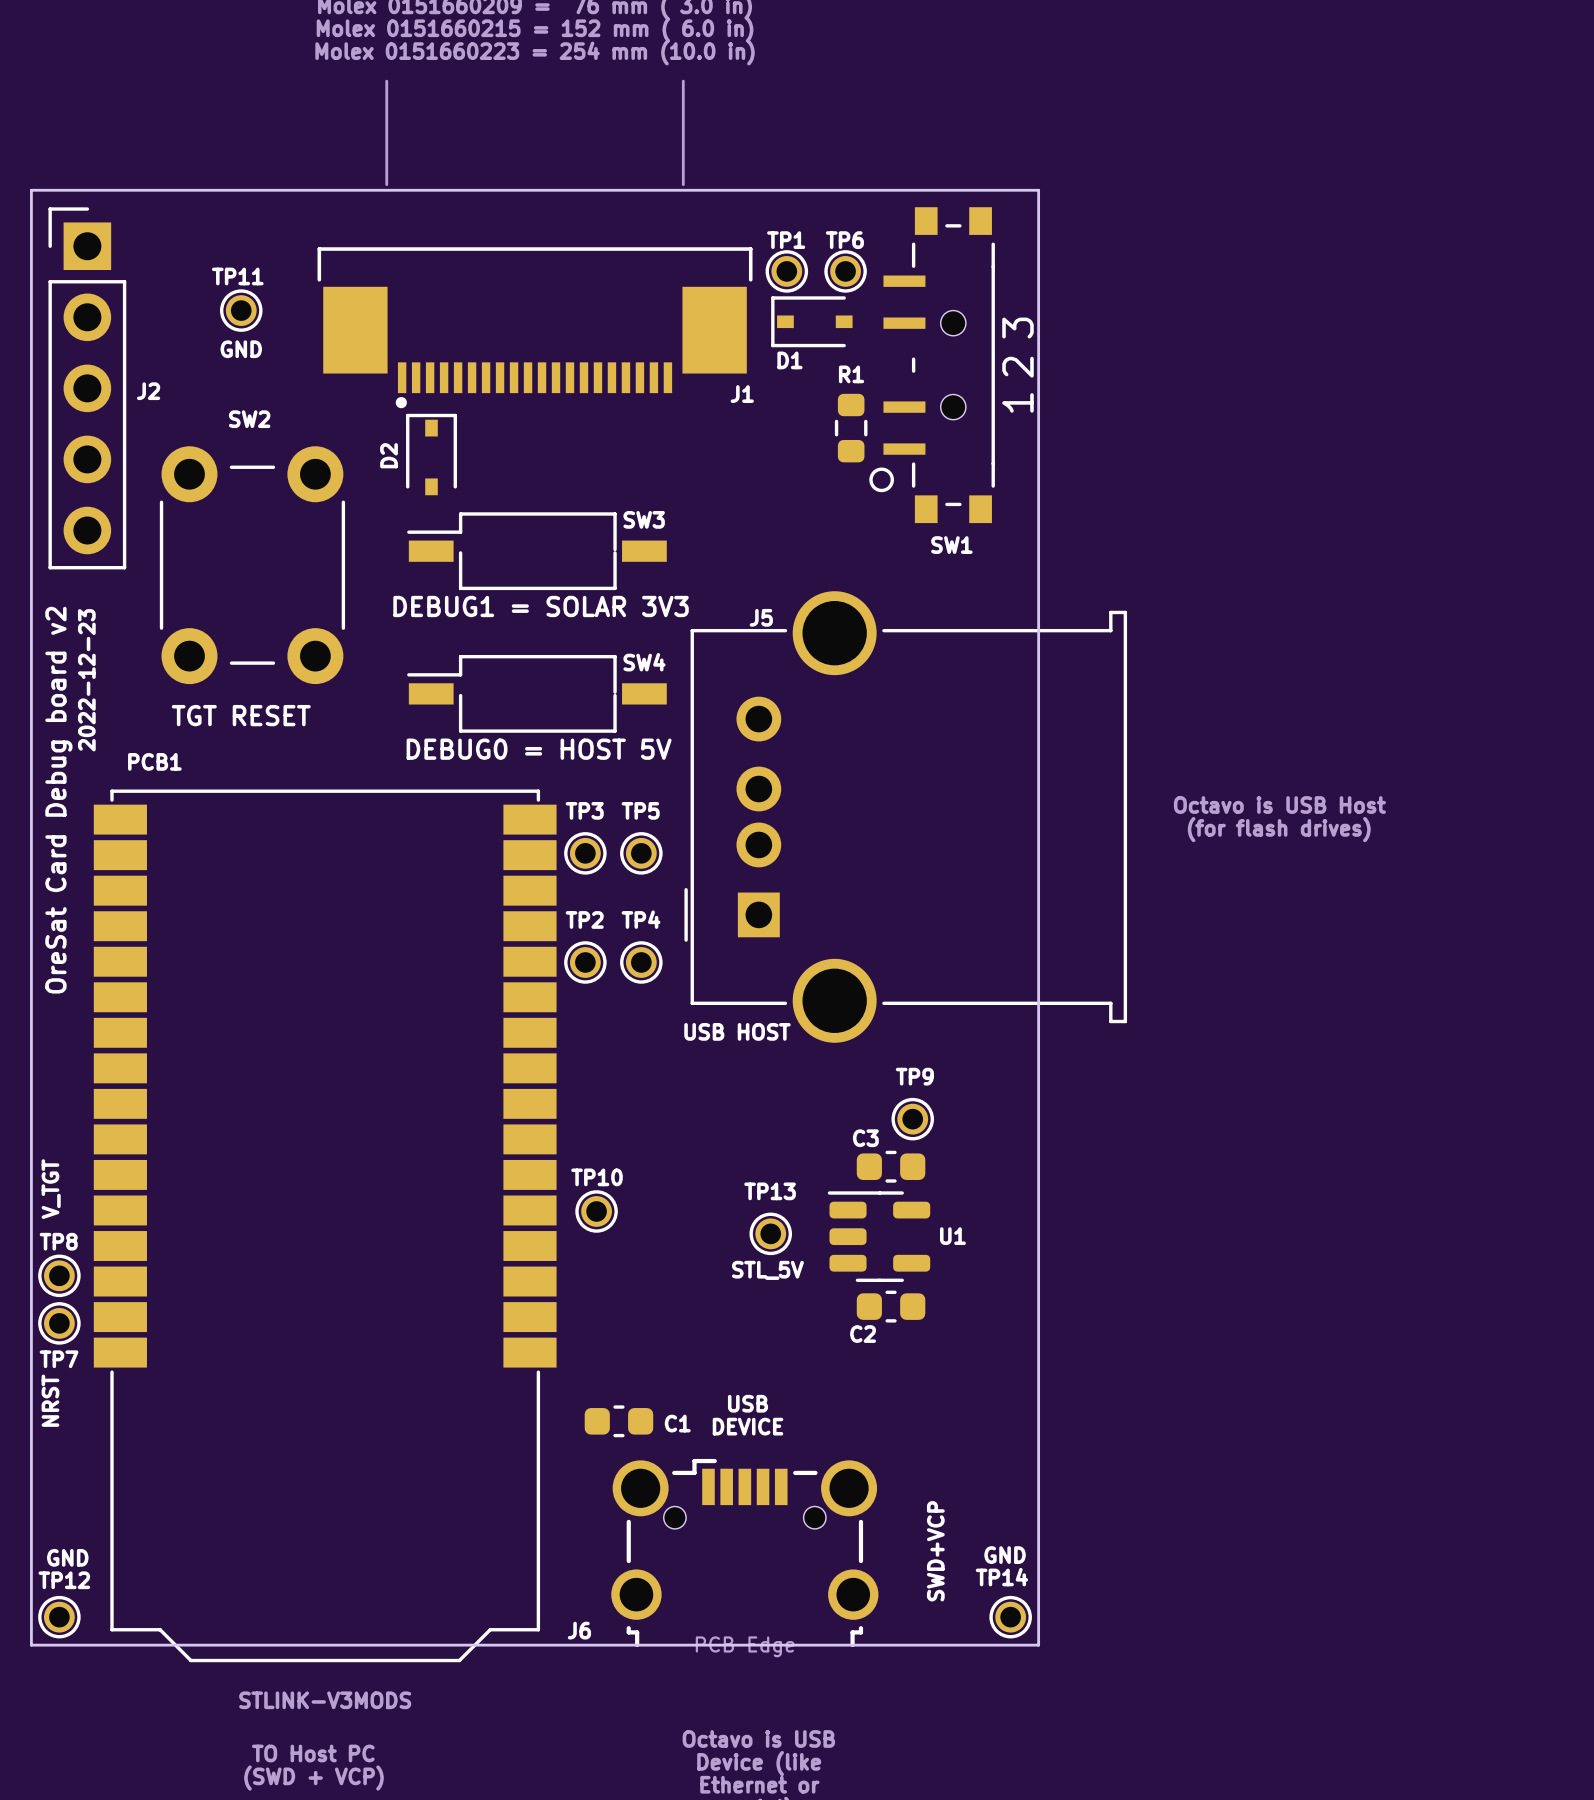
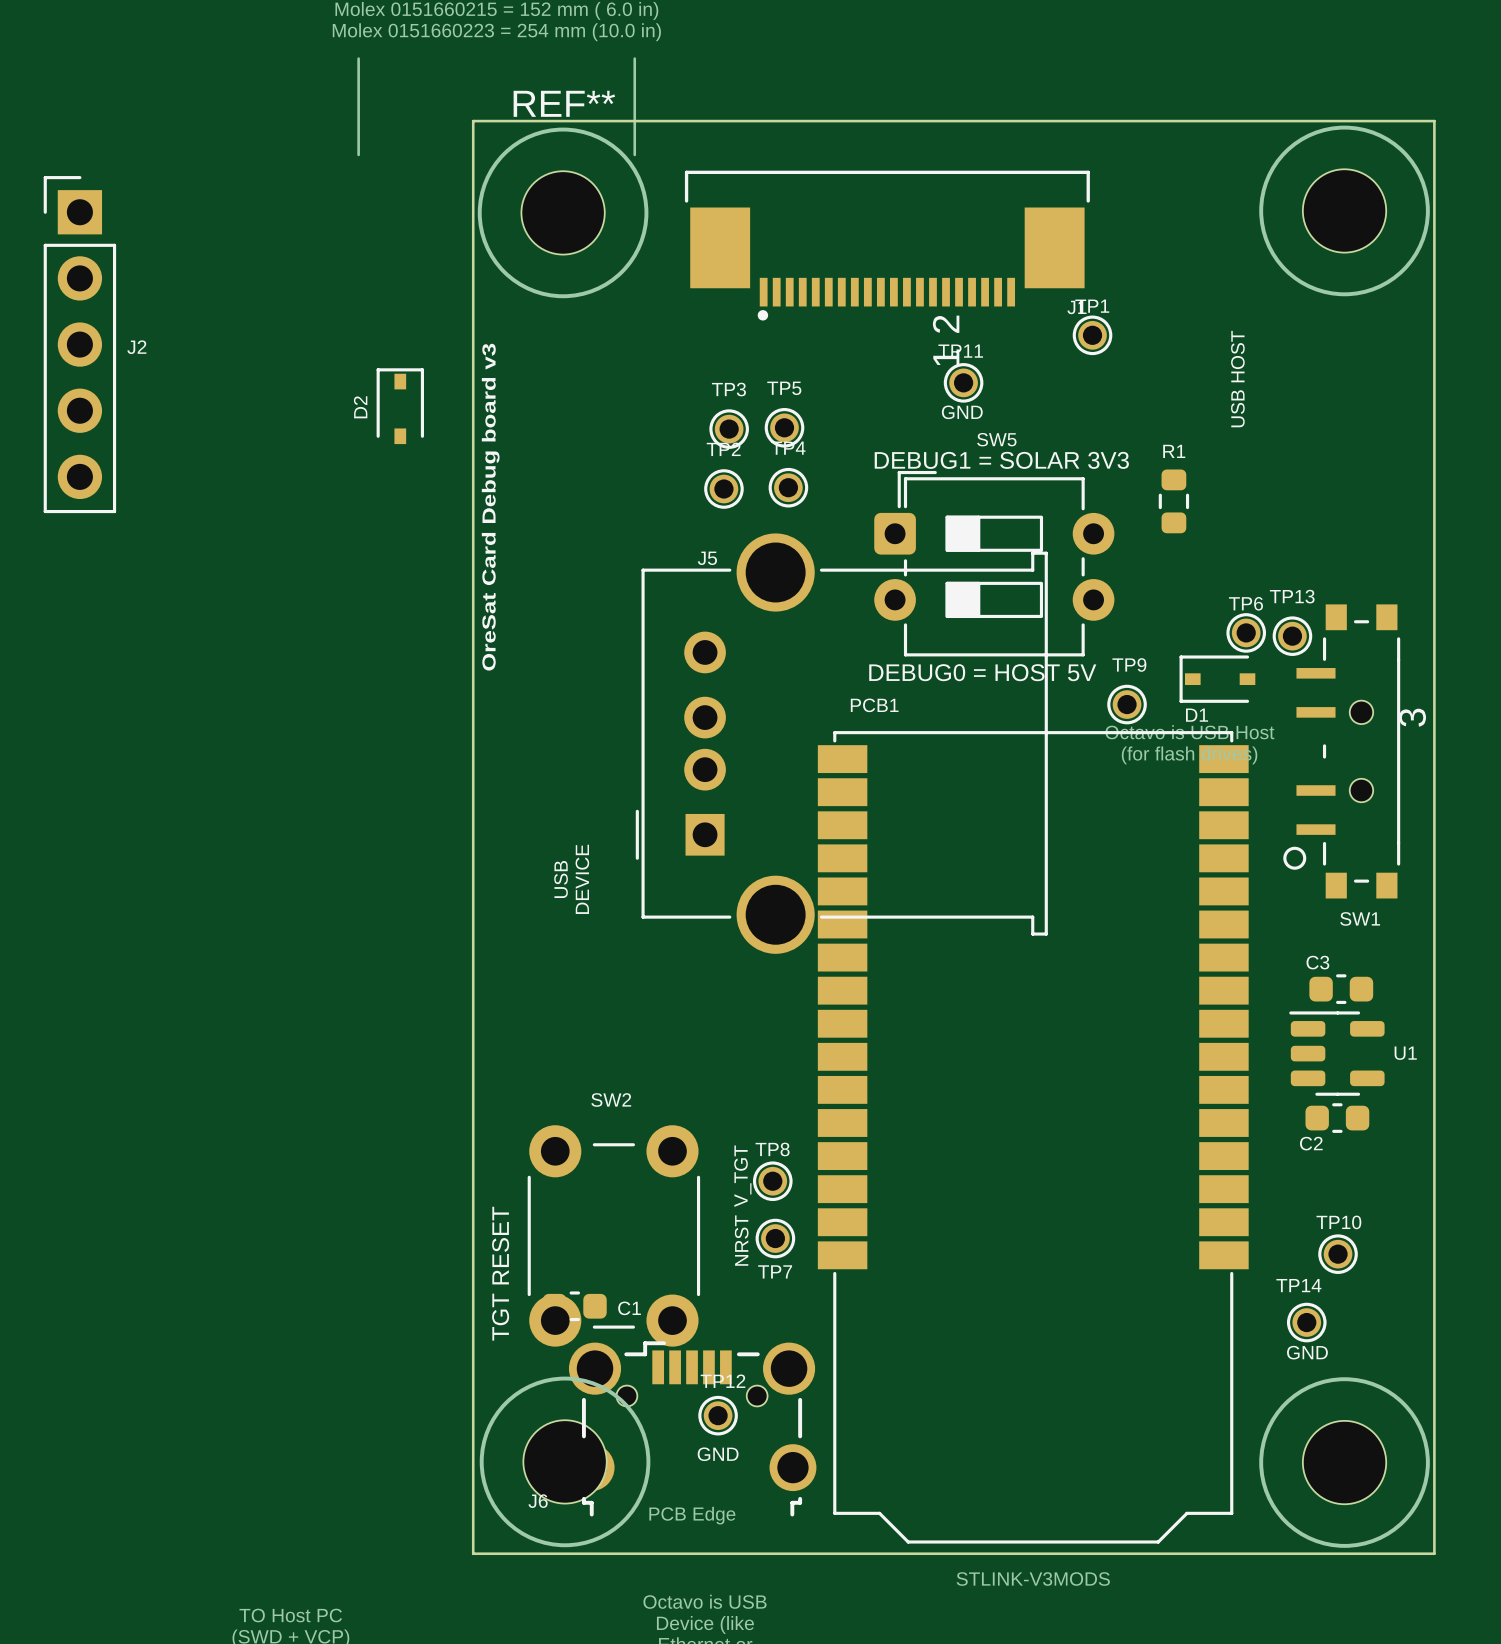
board edge: none -> (473, 121) (1434, 121) (1434, 1553) (473, 1553) (473, 121)
board edge: (31, 190) (1038, 190) (1038, 1645) (31, 1645) (31, 190) -> none
part: none -> (1344, 210)
REF**: none -> (563, 212)
TP1 position: (786, 271) -> (1092, 335)
TP6 position: (845, 271) -> (1246, 632)
TP11 position: (241, 310) -> (963, 382)
D1 position: (811, 321) -> (1217, 679)
J1 position: (535, 327) -> (887, 245)
text position: 3 (1018, 328) -> 3 (1412, 717)
text: GND (241, 349) -> none
SW1 position: (932, 365) -> (1341, 751)
text: none -> USB HOST (1237, 379)
R1 position: (851, 428) -> (1173, 501)
text: none -> GND (962, 412)
SW3: (536, 551) -> none
text: none -> OreSat Card Debug board v3 (490, 507)
SW2 position: (252, 565) -> (613, 1235)
text position: DEBUG1 = SOLAR 3V3 (541, 606) -> DEBUG1 = SOLAR 3V3 (1001, 460)
SW5: none -> (994, 563)
text: 2022-12-23 (86, 680) -> none
SW4: (536, 693) -> none
text: TGT RESET (241, 715) -> none
text position: DEBUG0 = HOST 5V (539, 749) -> DEBUG0 = HOST 5V (982, 672)
text: OreSat Card Debug board v2 (58, 800) -> none
TP3 position: (585, 853) -> (729, 429)
TP5 position: (641, 853) -> (784, 427)
TP2 position: (585, 962) -> (723, 489)
TP4 position: (641, 962) -> (788, 487)
text: USB HOST (737, 1031) -> none
TP9 position: (912, 1119) -> (1127, 704)
C3 position: (891, 1166) -> (1341, 989)
text: V_TGT (51, 1189) -> none
TP10 position: (596, 1211) -> (1338, 1254)
PCB1 position: (325, 1225) -> (1033, 1137)
TP13 position: (770, 1233) -> (1292, 636)
U1 position: (879, 1236) -> (1336, 1053)
text: STL_5V (767, 1270) -> none
TP8 position: (59, 1275) -> (772, 1181)
text: none -> V_TGT (742, 1176)
C2 position: (891, 1306) -> (1337, 1118)
TP7 position: (59, 1323) -> (775, 1238)
text: none -> NRST (741, 1240)
text: none -> TGT RESET (500, 1273)
text: NRST (50, 1400) -> none
text rotation: 0° (747, 1403) -> 90° counterclockwise (561, 879)
text position: USB (747, 1403) -> USB (561, 879)
text rotation: 0° (747, 1426) -> 90° counterclockwise (582, 879)
text position: DEVICE (747, 1426) -> DEVICE (582, 879)
text: none -> GND (1307, 1352)
text: SWD+VCP (935, 1551) -> none
text: GND (1005, 1555) -> none
text: GND (67, 1557) -> none
text: none -> GND (718, 1454)
part: none -> (565, 1461)
part: none -> (1344, 1462)
TP12 position: (59, 1617) -> (718, 1415)
TP14 position: (1010, 1617) -> (1306, 1322)

